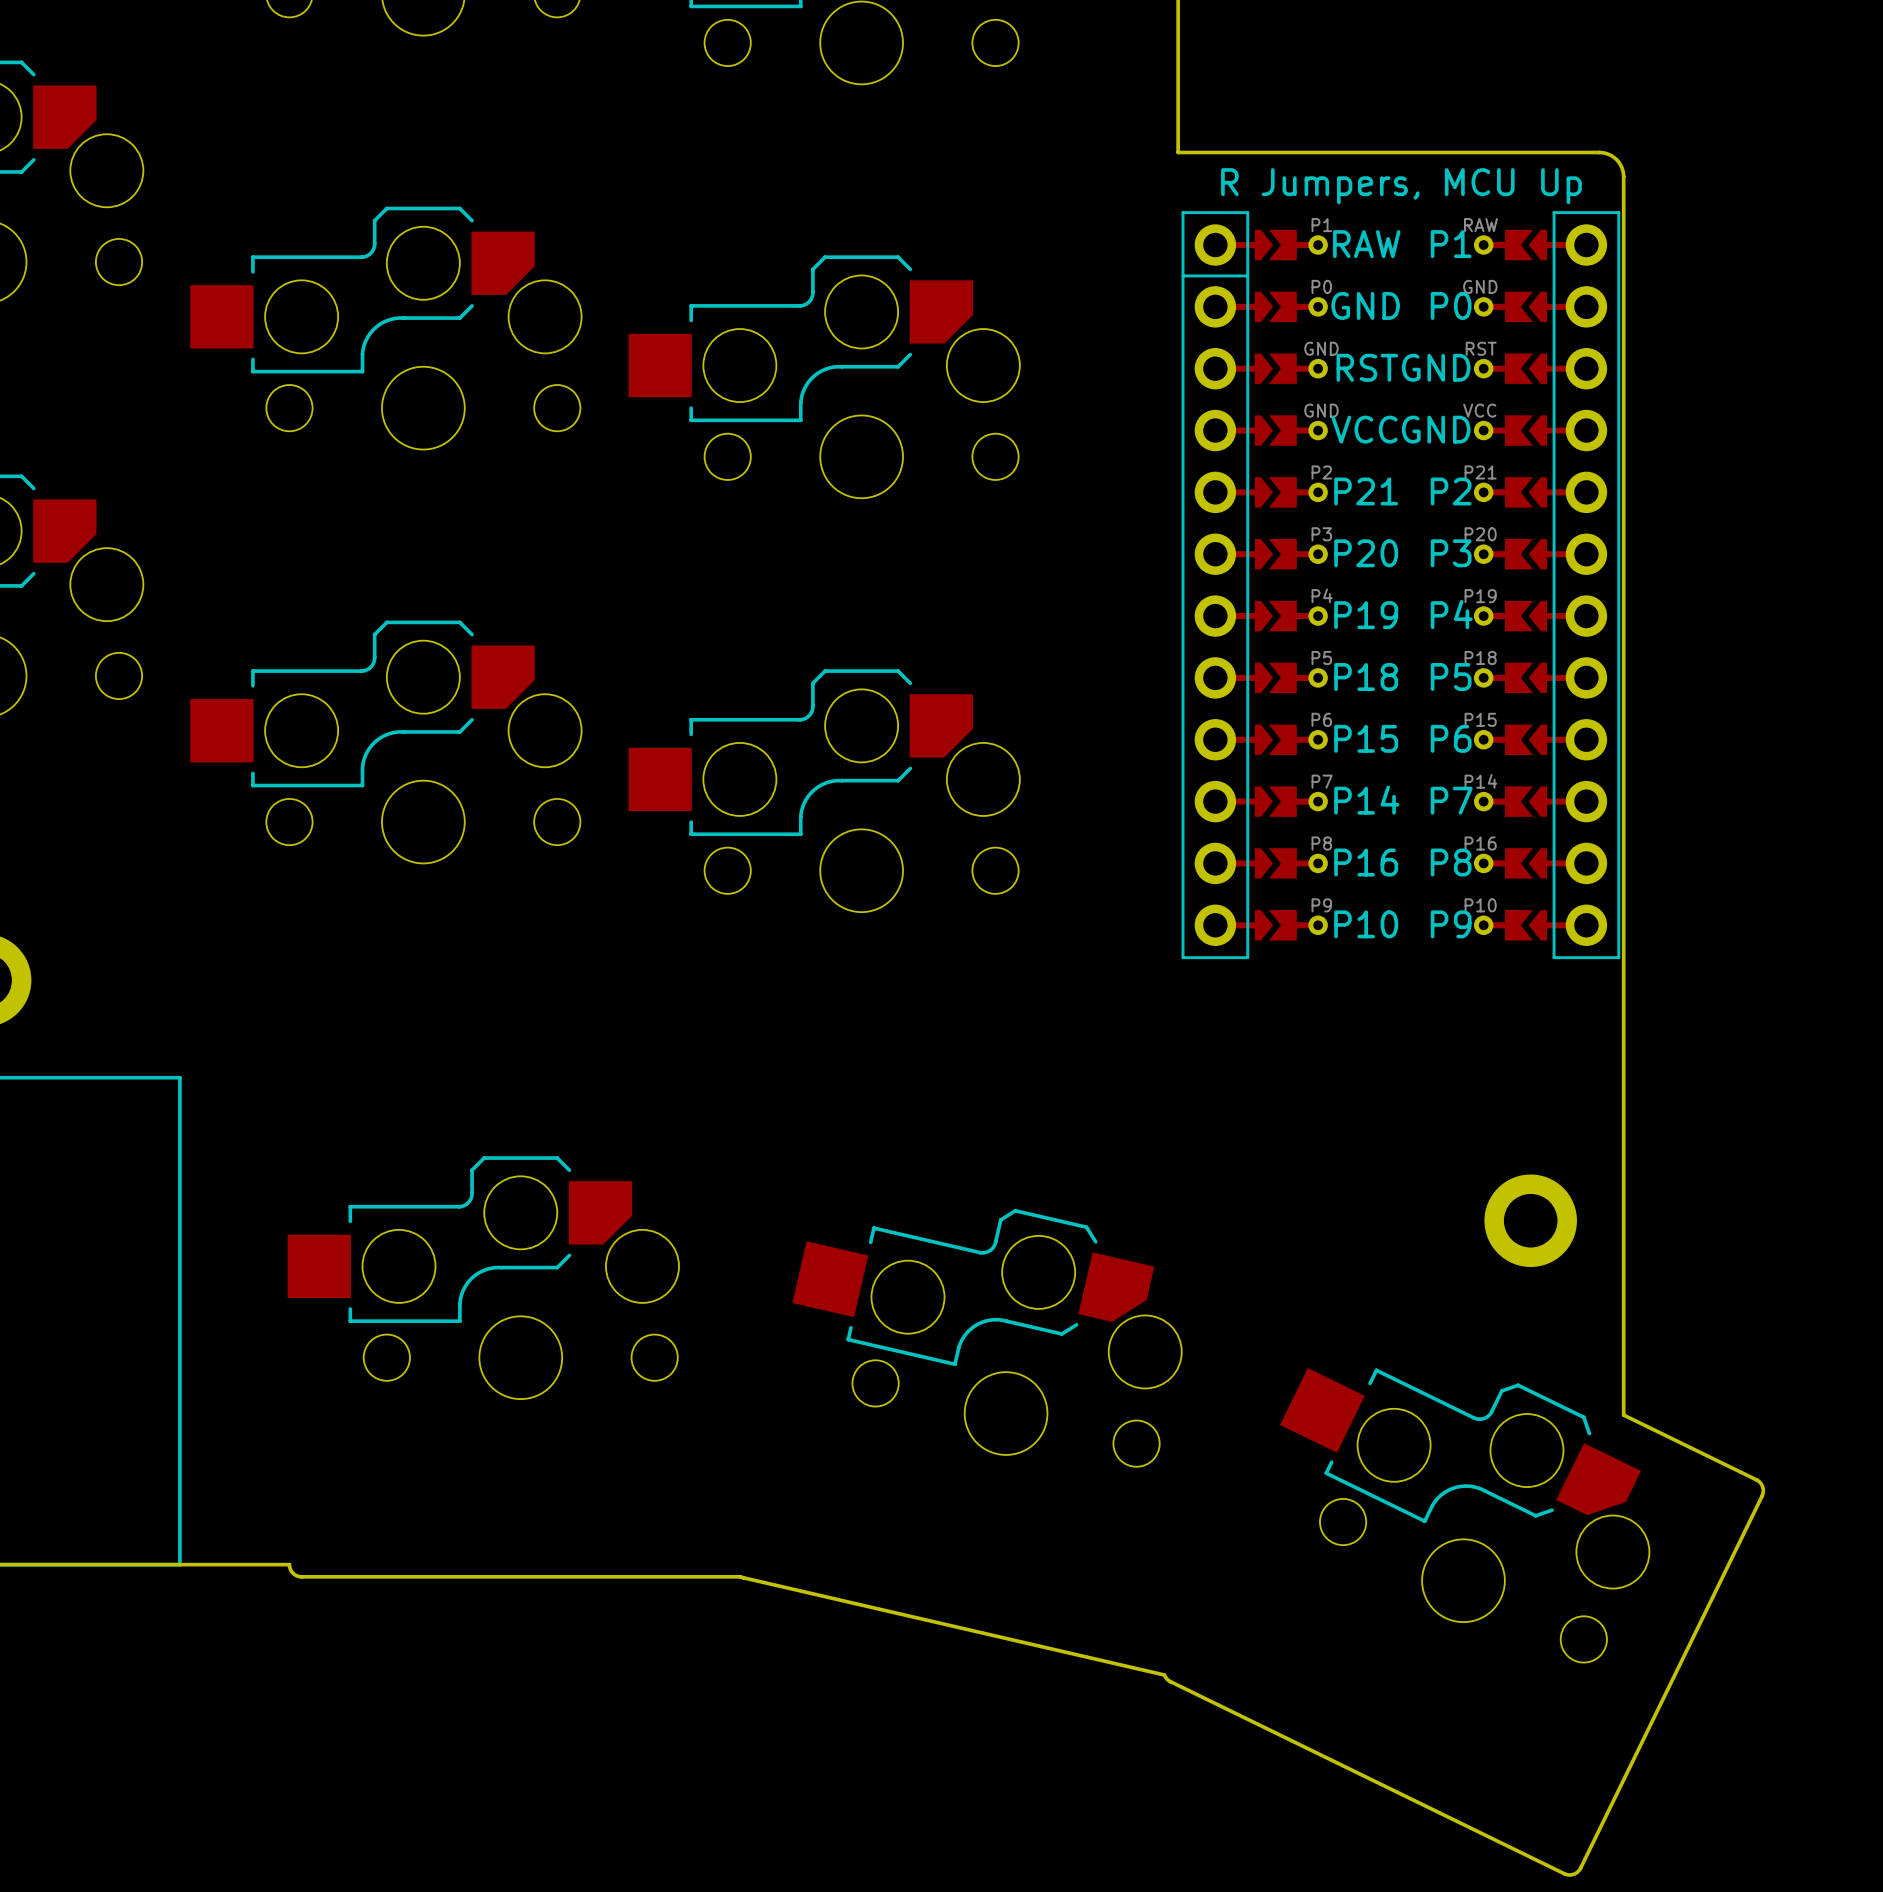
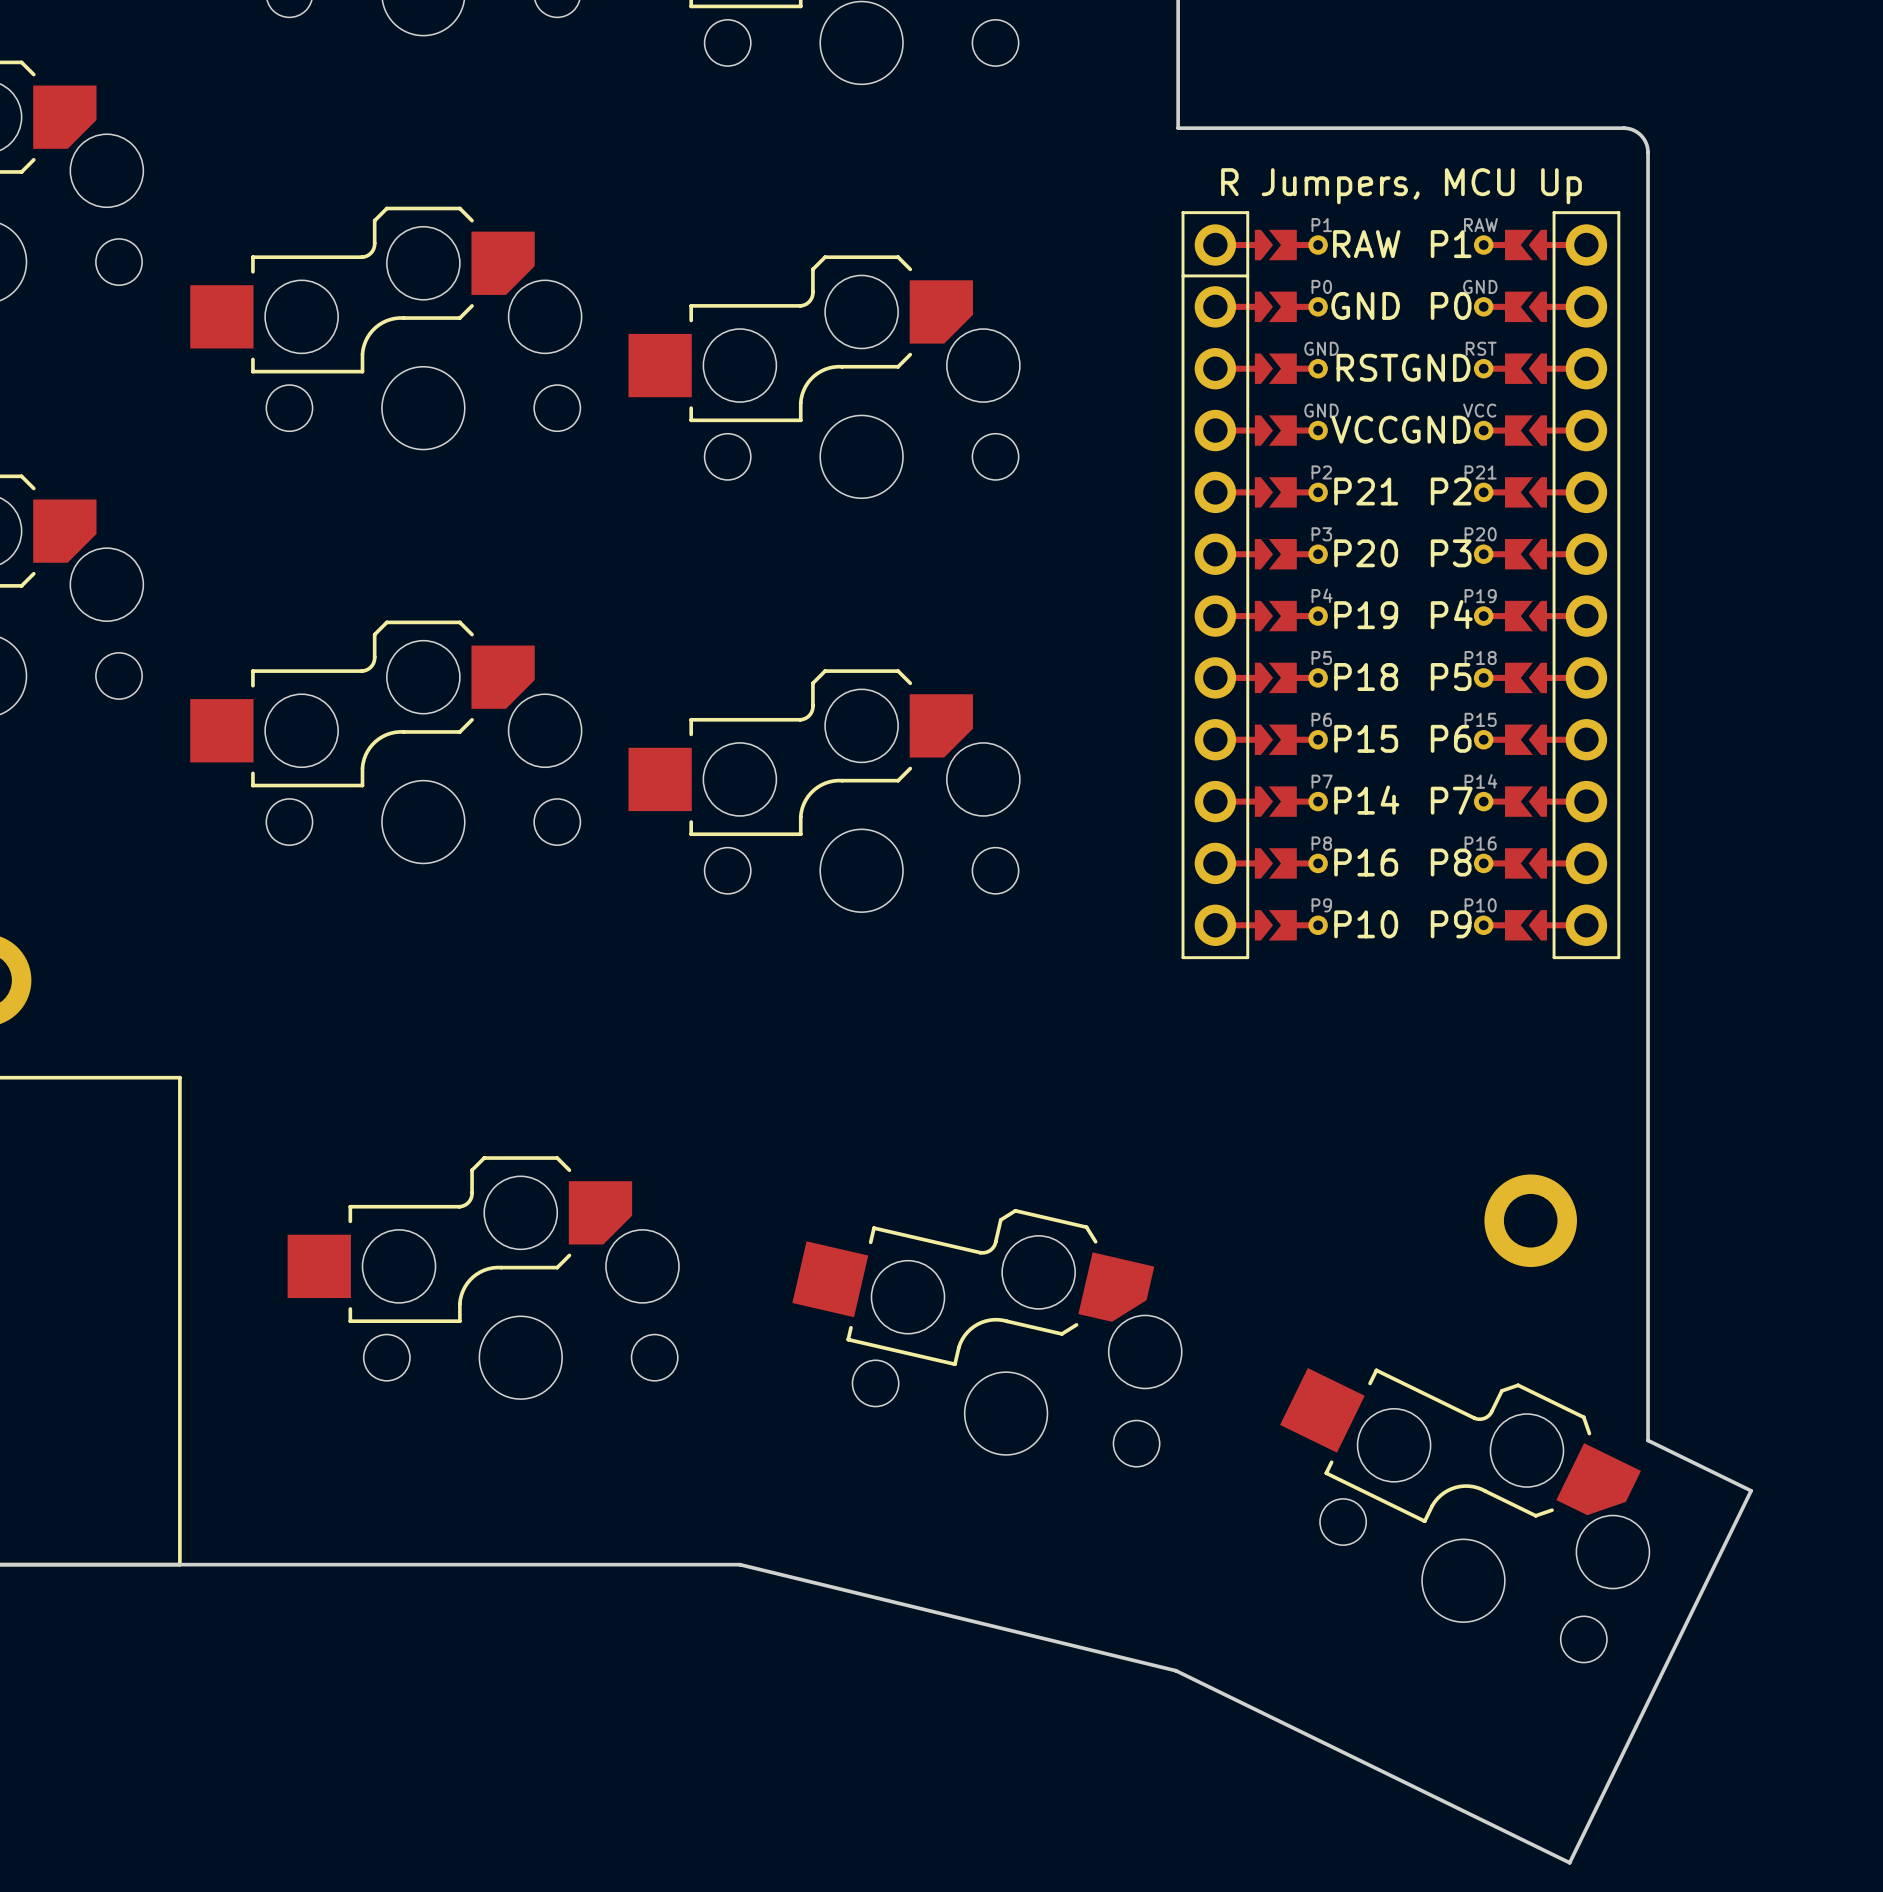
board edge: (1178, 128) (1178, 152) (1599, 152) (1614, 157) (1623, 171) (1623, 1415) (1756, 1479) (1762, 1485) (1763, 1491) (1579, 1869) (1573, 1874) (1564, 1873) (1170, 1681) (1164, 1674) (740, 1576) (301, 1576) (293, 1573) (289, 1564) -> (1178, 128) (1623, 128) (1638, 133) (1647, 147) (1648, 1440) (1751, 1490) (1569, 1862) (1175, 1670) (739, 1564) (289, 1564)

